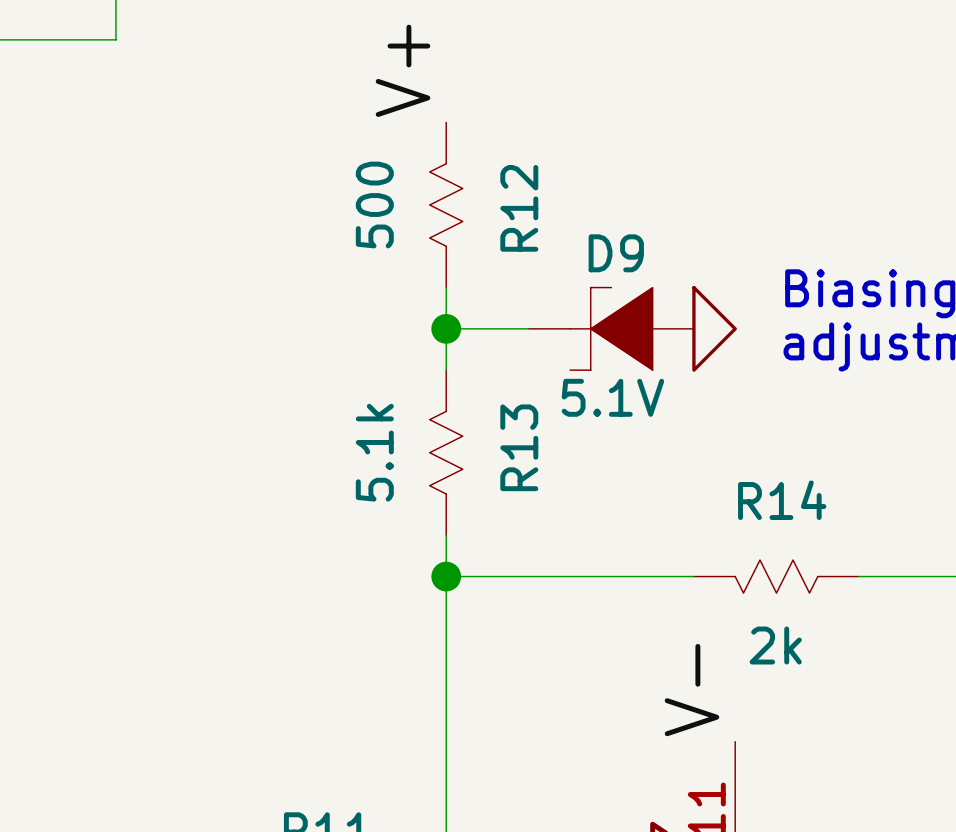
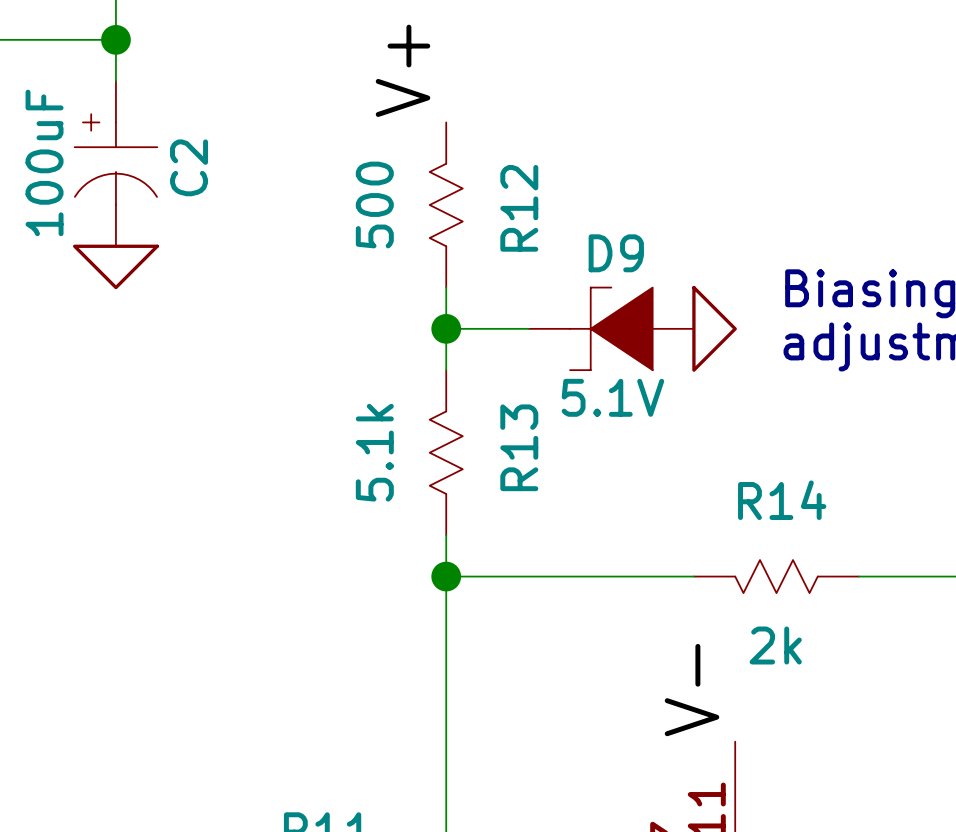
wire: none -> (115, 39) (115, 81)
junction: none -> (115, 39)
C2: none -> 100uF (115, 163)
power symbol: none -> (115, 266)

